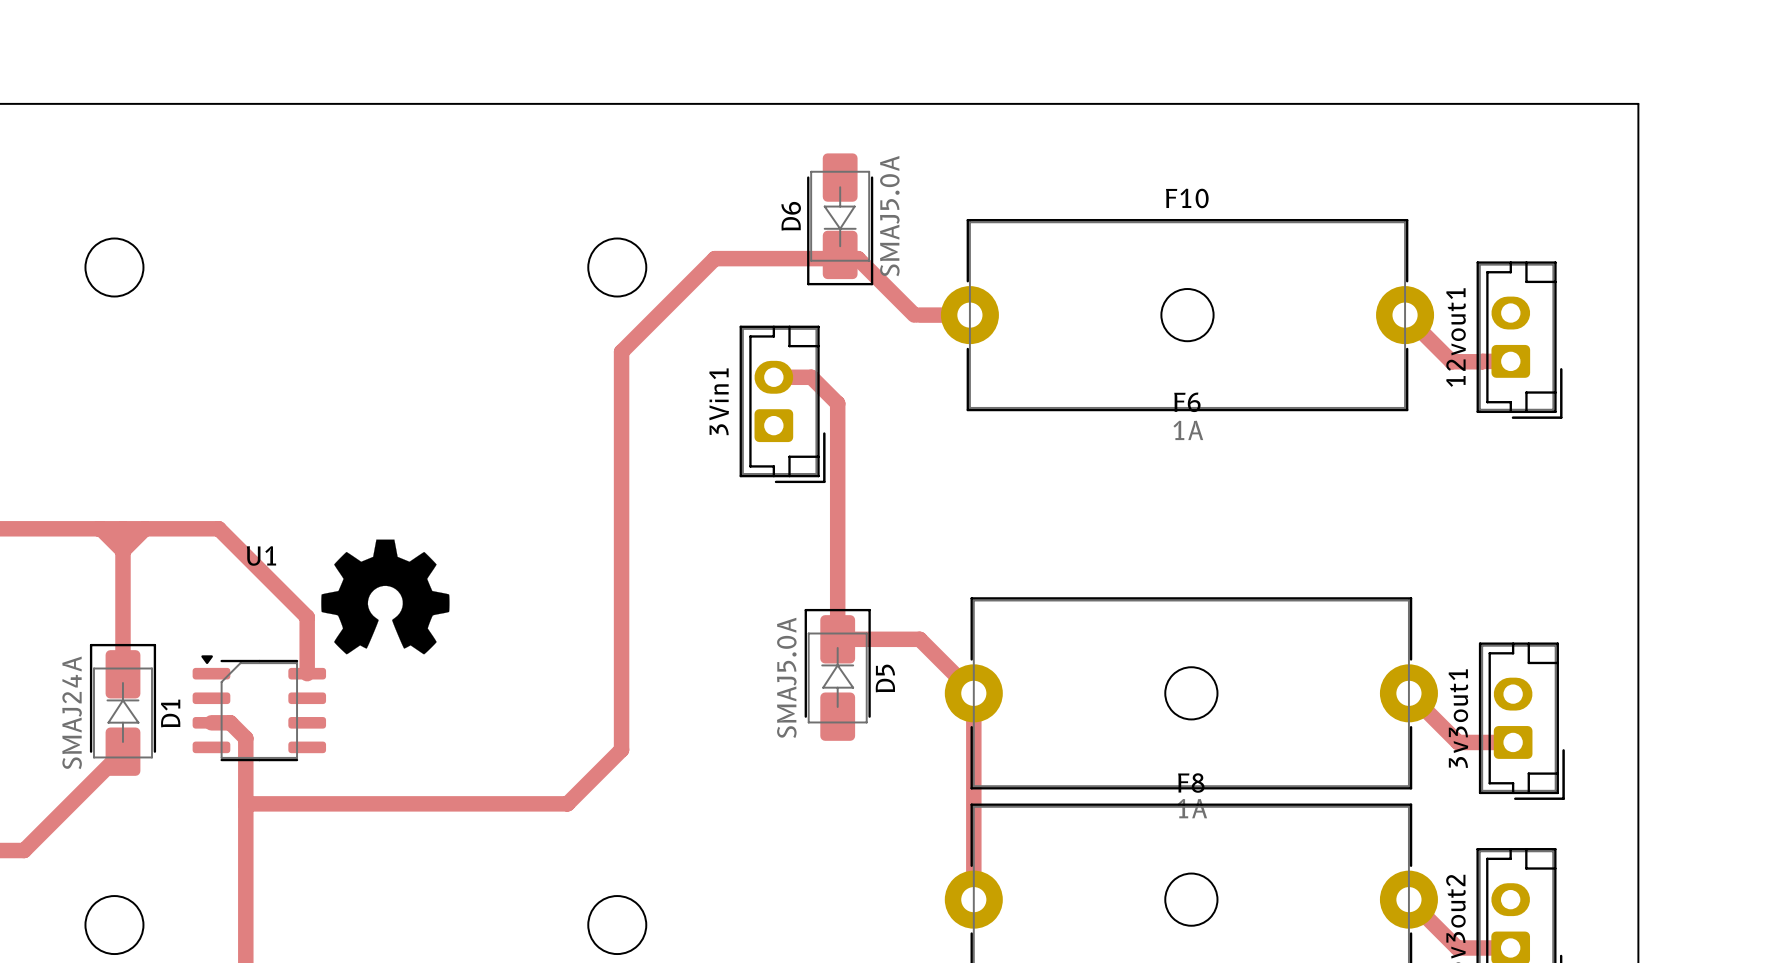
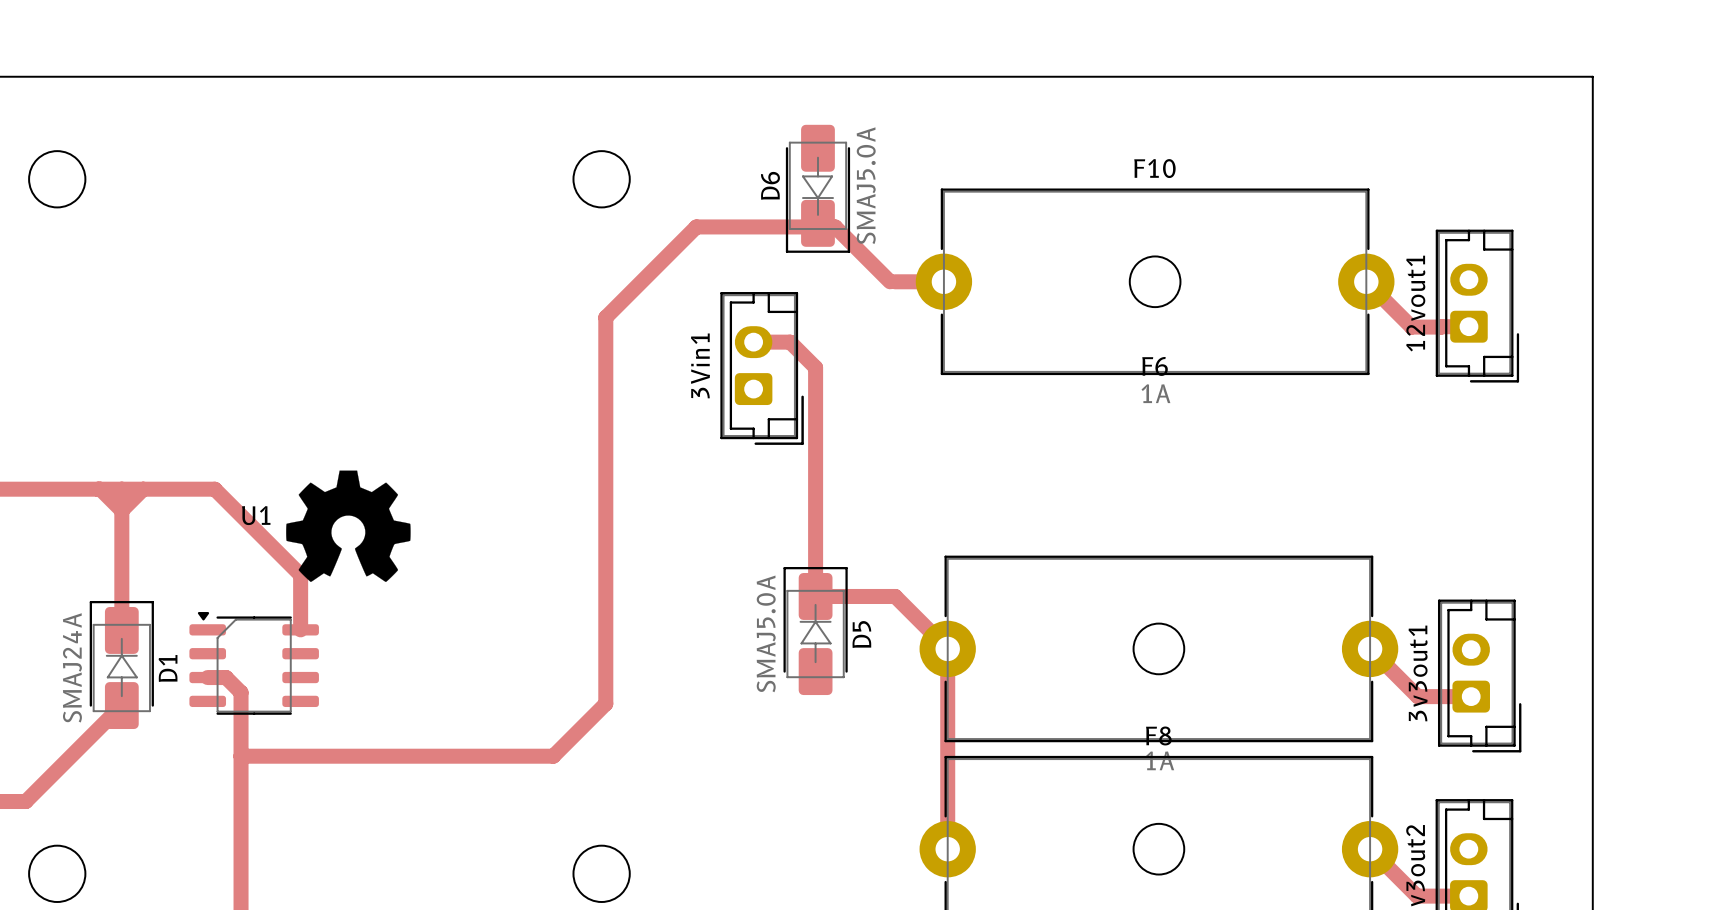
round board edge position: (114, 267) -> (57, 179)
round board edge position: (617, 267) -> (601, 179)
drawing position: (385, 596) -> (348, 526)
round board edge position: (114, 925) -> (57, 873)

